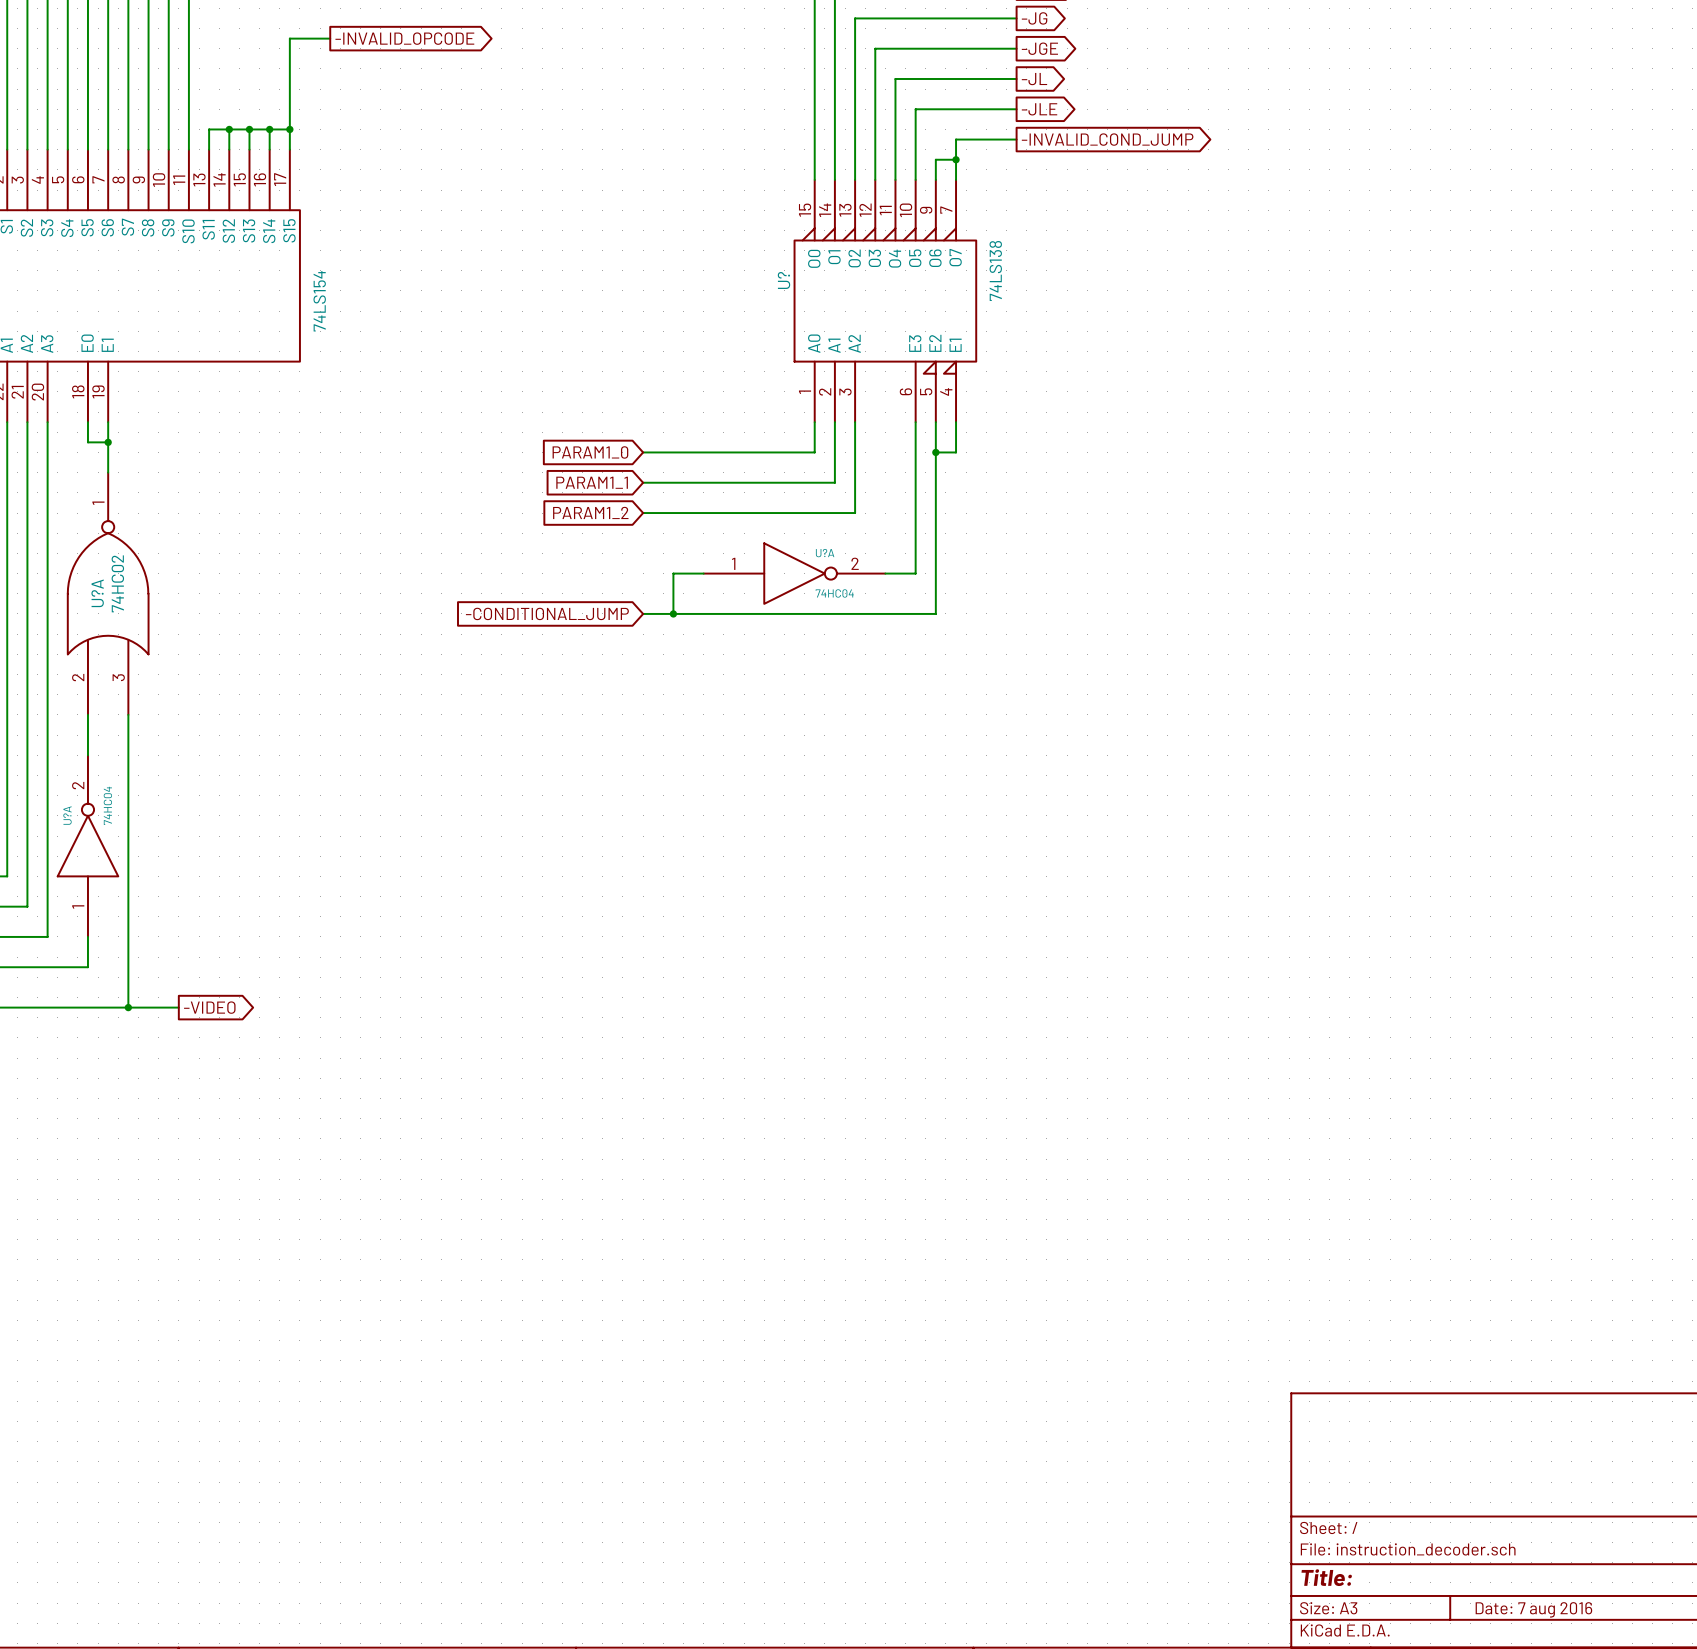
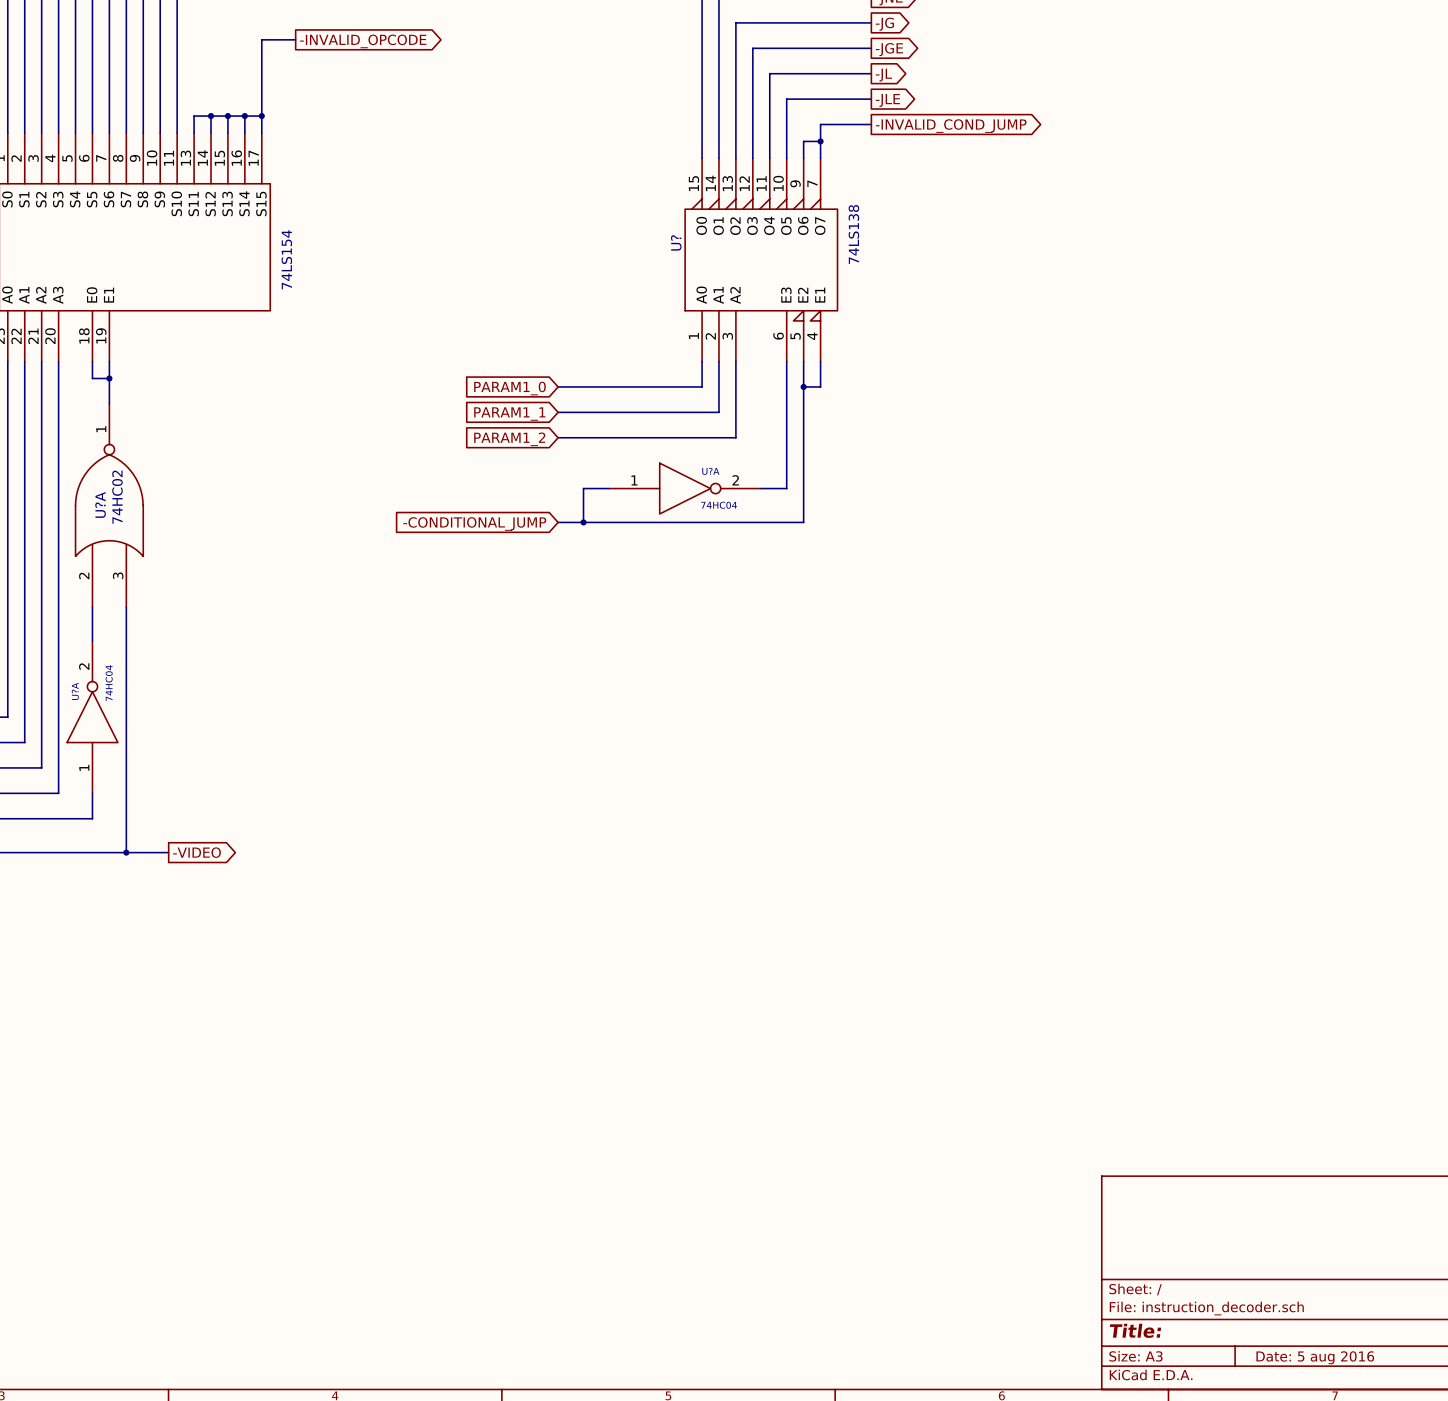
title block: Date: 7 aug 2016 (1533, 1609) -> Date: 5 aug 2016 (1315, 1357)

